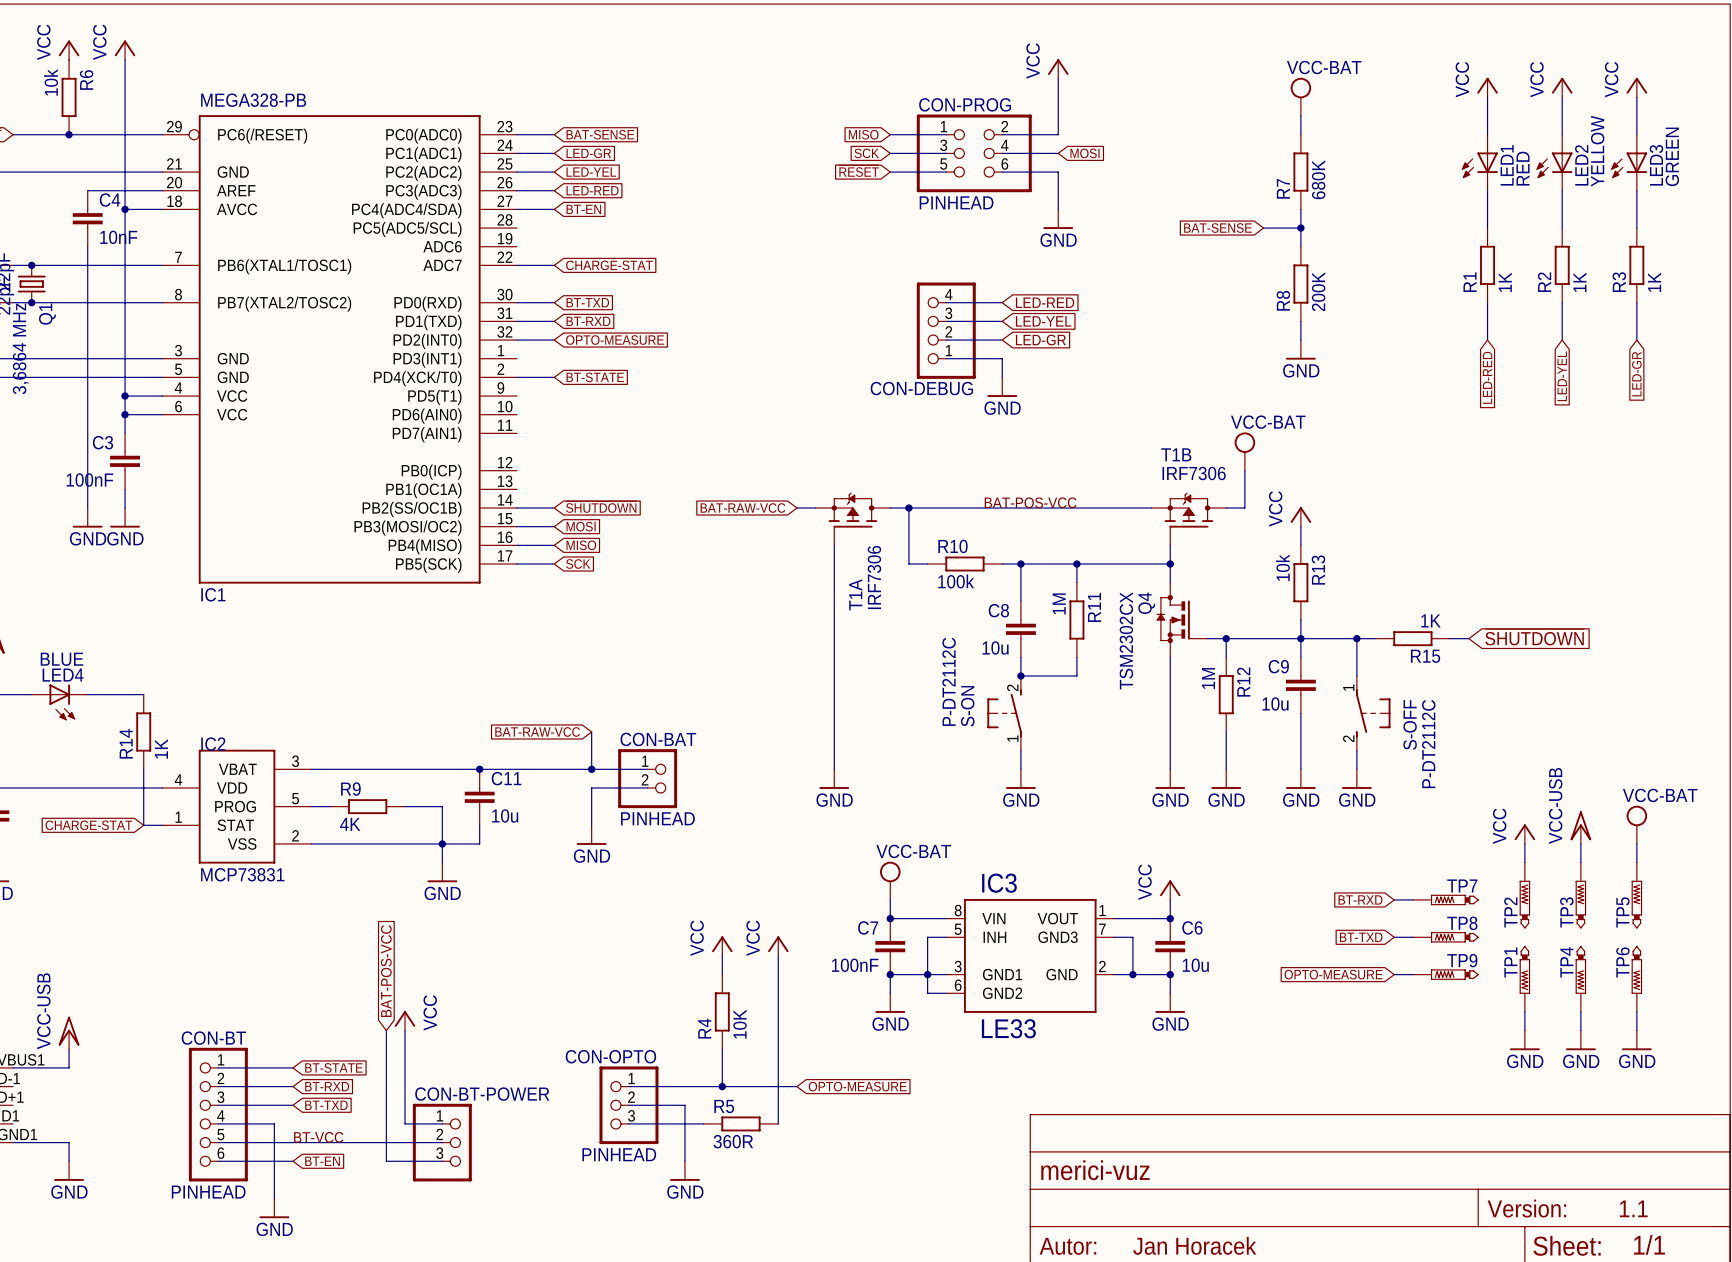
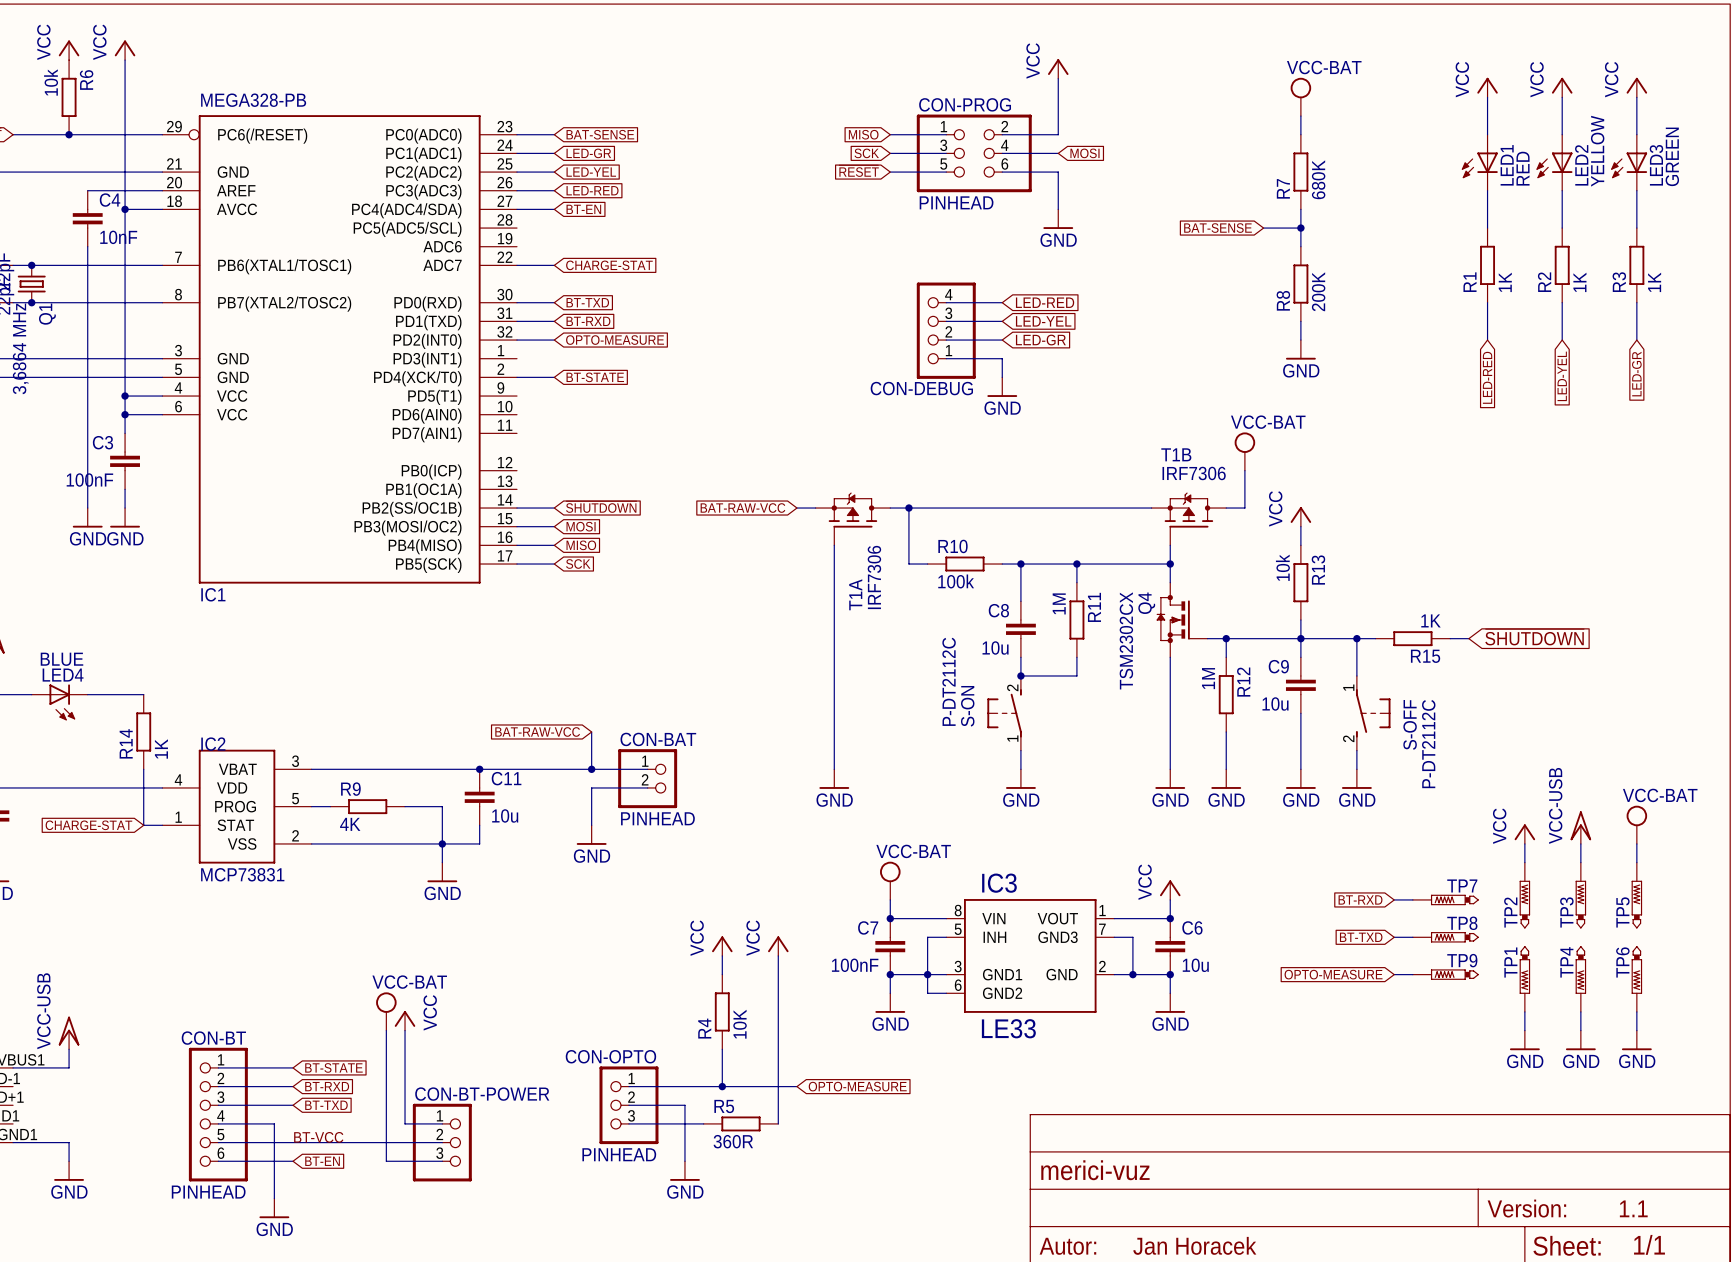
label: BAT-POS-VCC (1030, 502) -> none
global label: BAT-POS-VCC (386, 971) -> none
power symbol: none -> VCC-BAT (386, 1011)

